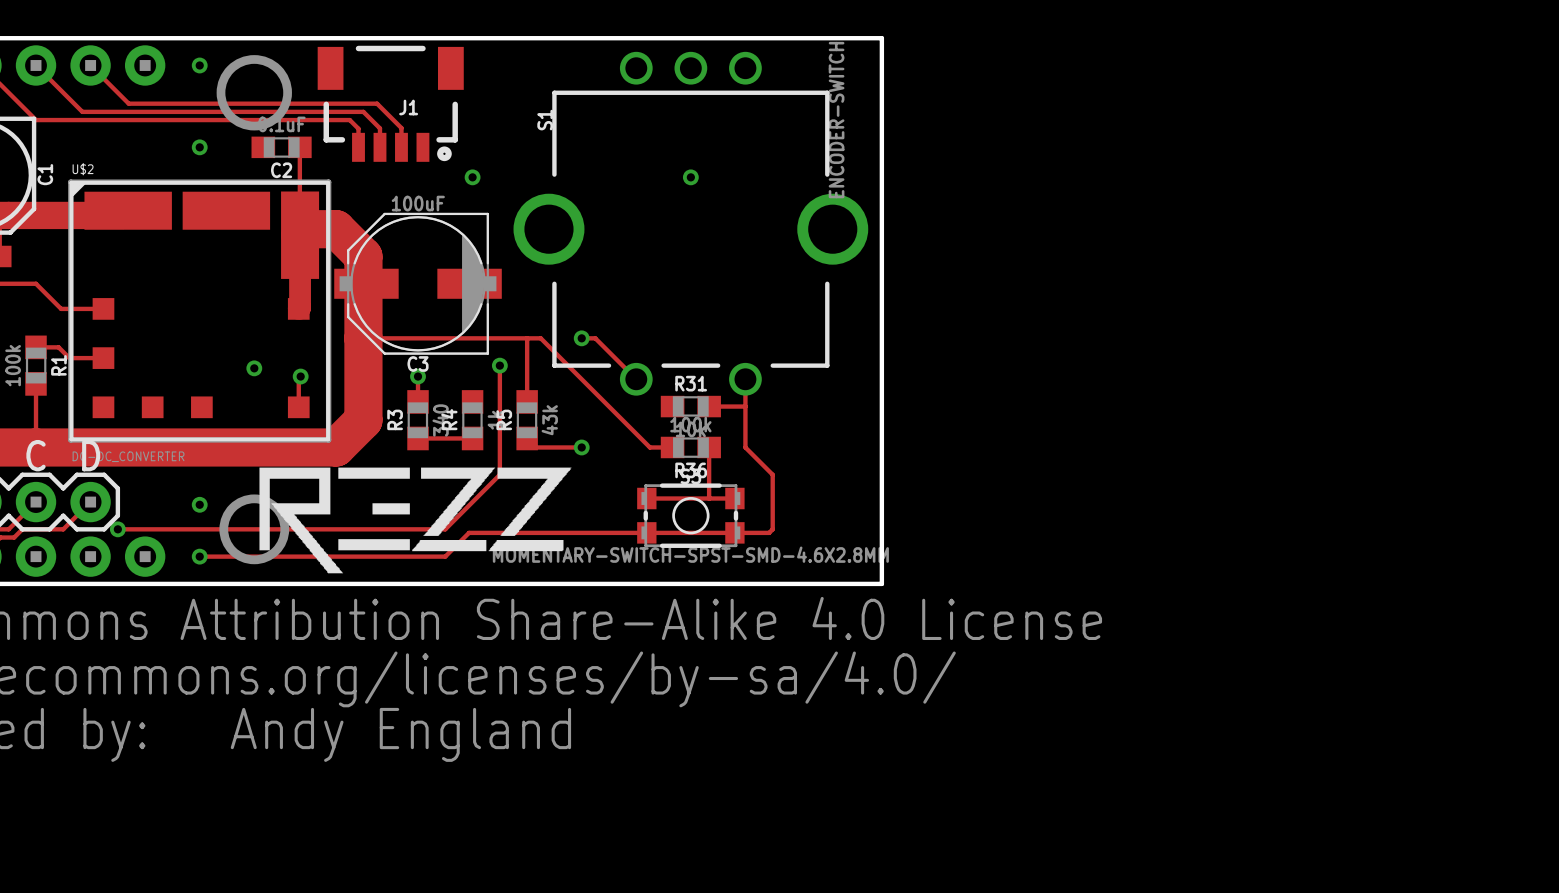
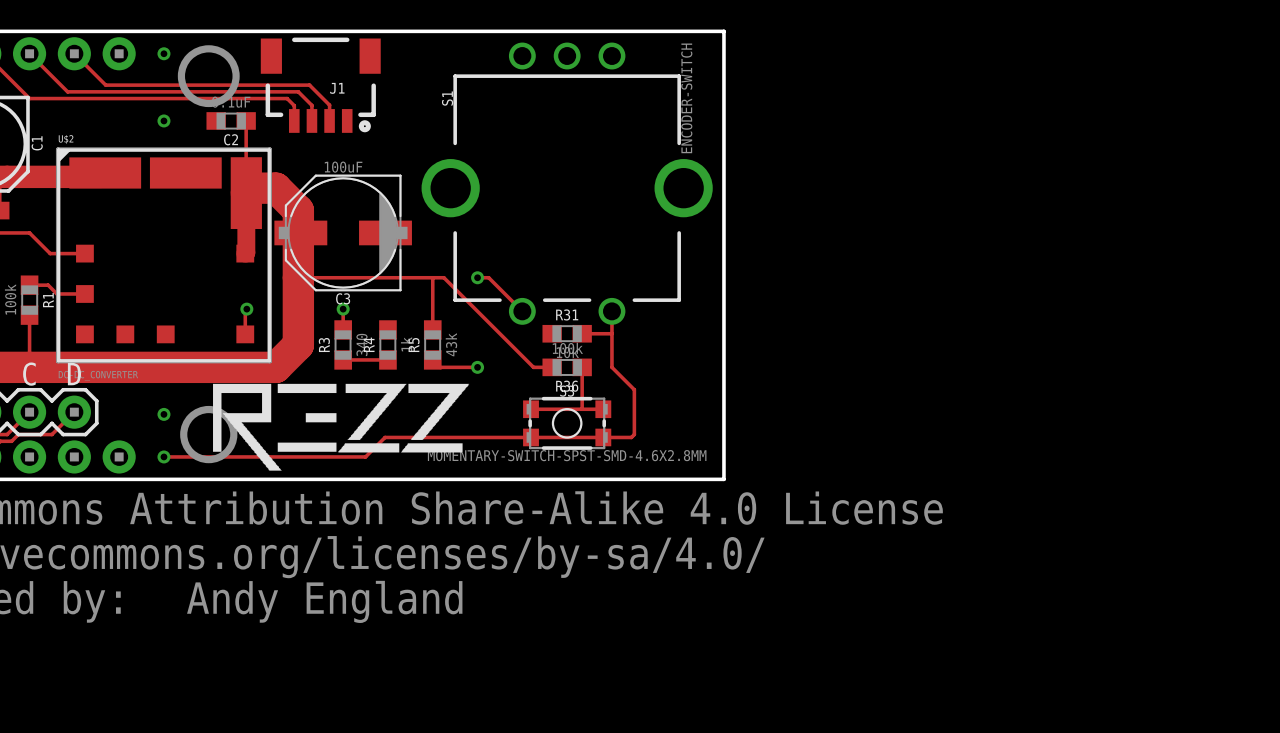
via: (472, 177) -> none
via: (690, 177) -> none
track: (499, 365) (499, 474) (445, 529) (117, 529) -> none
via: (499, 365) -> none
via: (254, 368) -> none
via: (117, 529) -> none

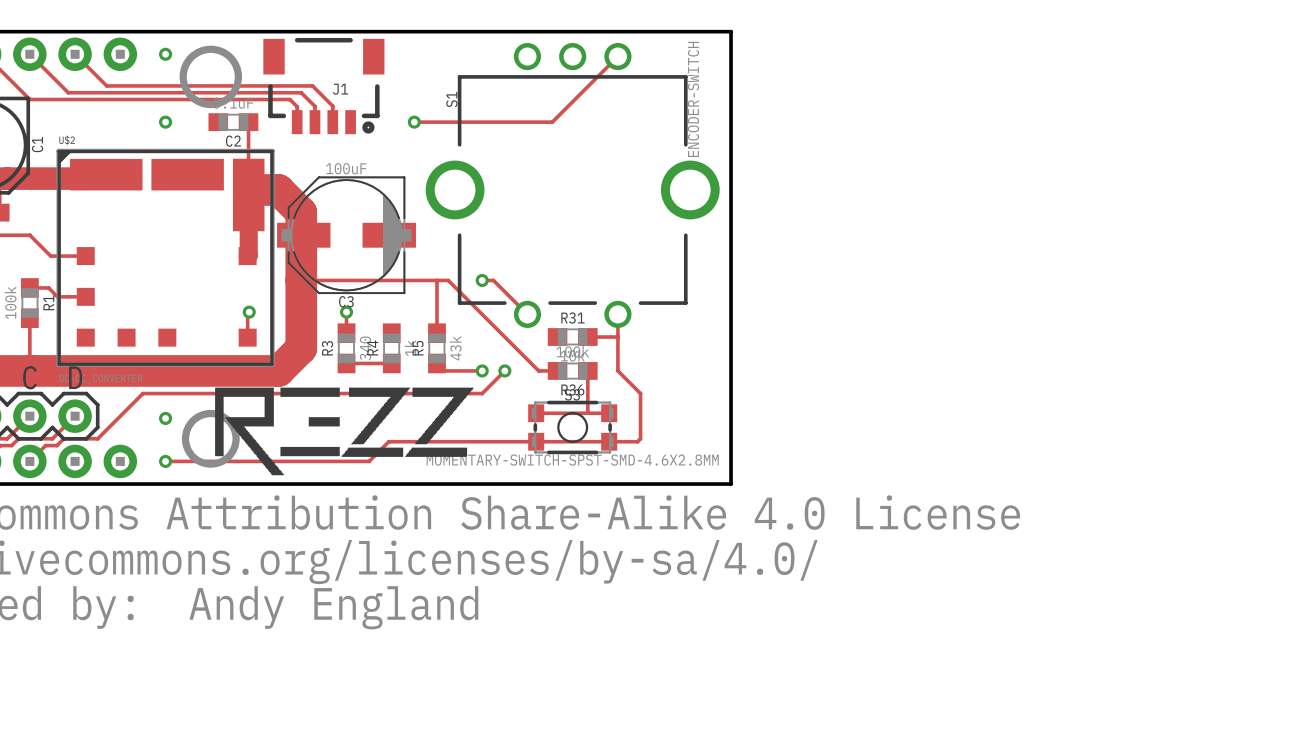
track: none -> (617, 56) (552, 122) (414, 122)
via: none -> (414, 122)
track: none -> (504, 370) (482, 393) (142, 393) (97, 438) (63, 438) (56, 445) (45, 445) (29, 461)
via: none -> (504, 370)

